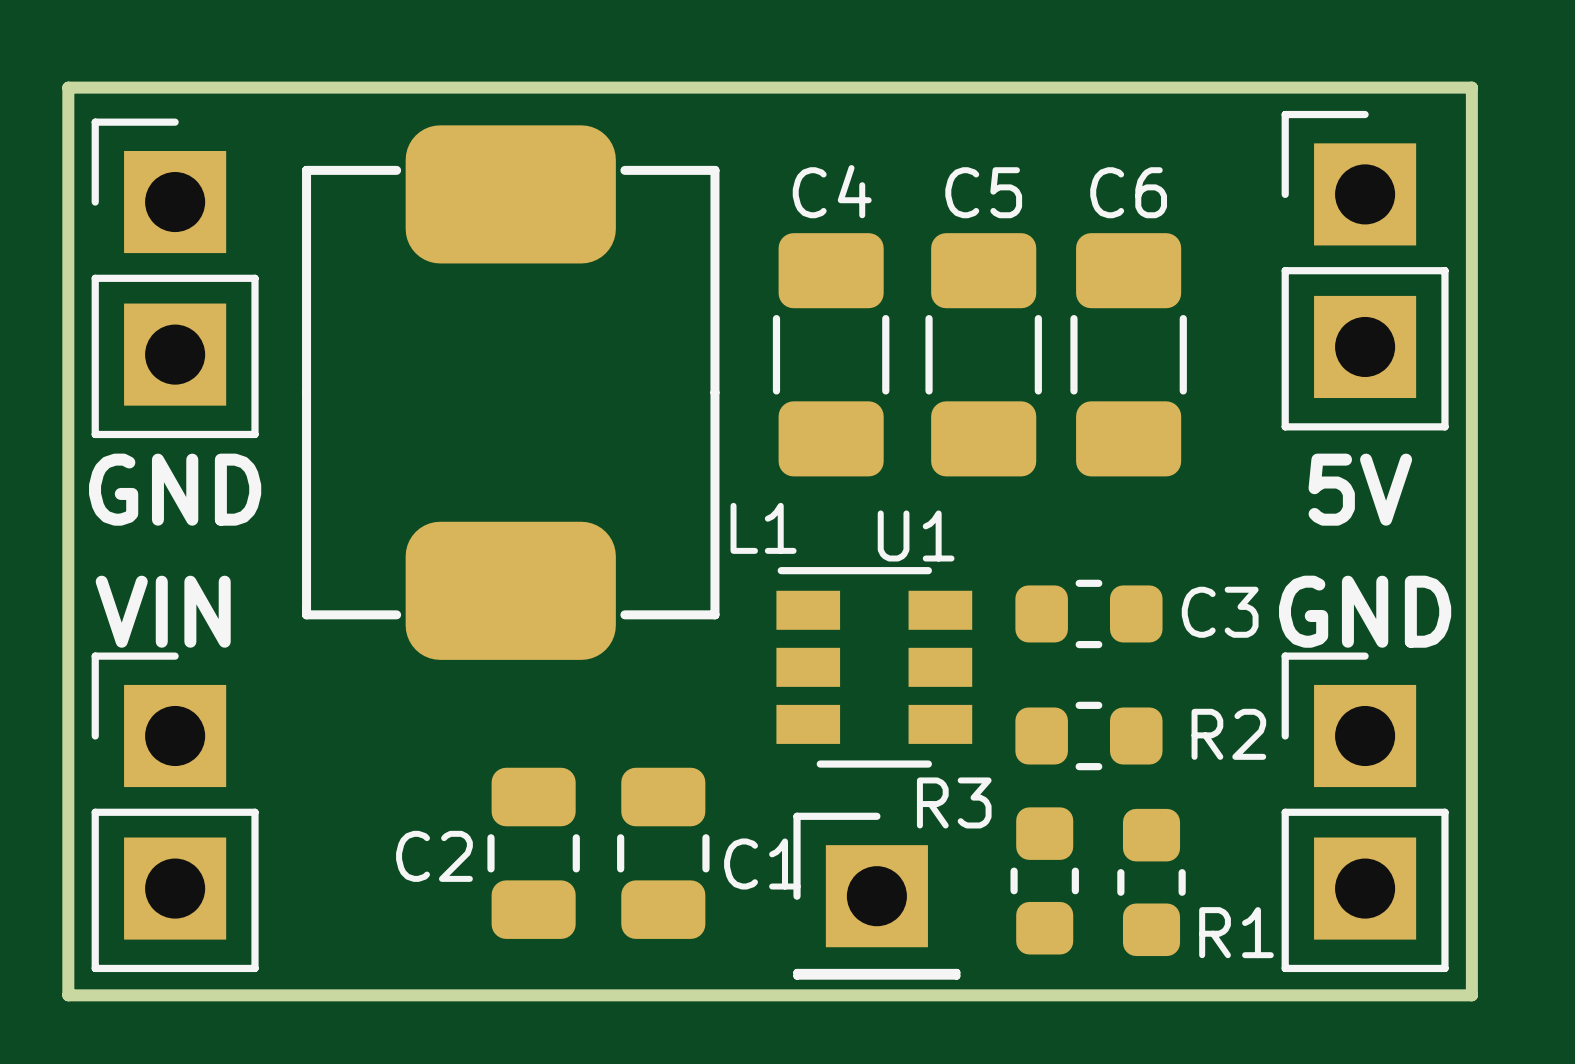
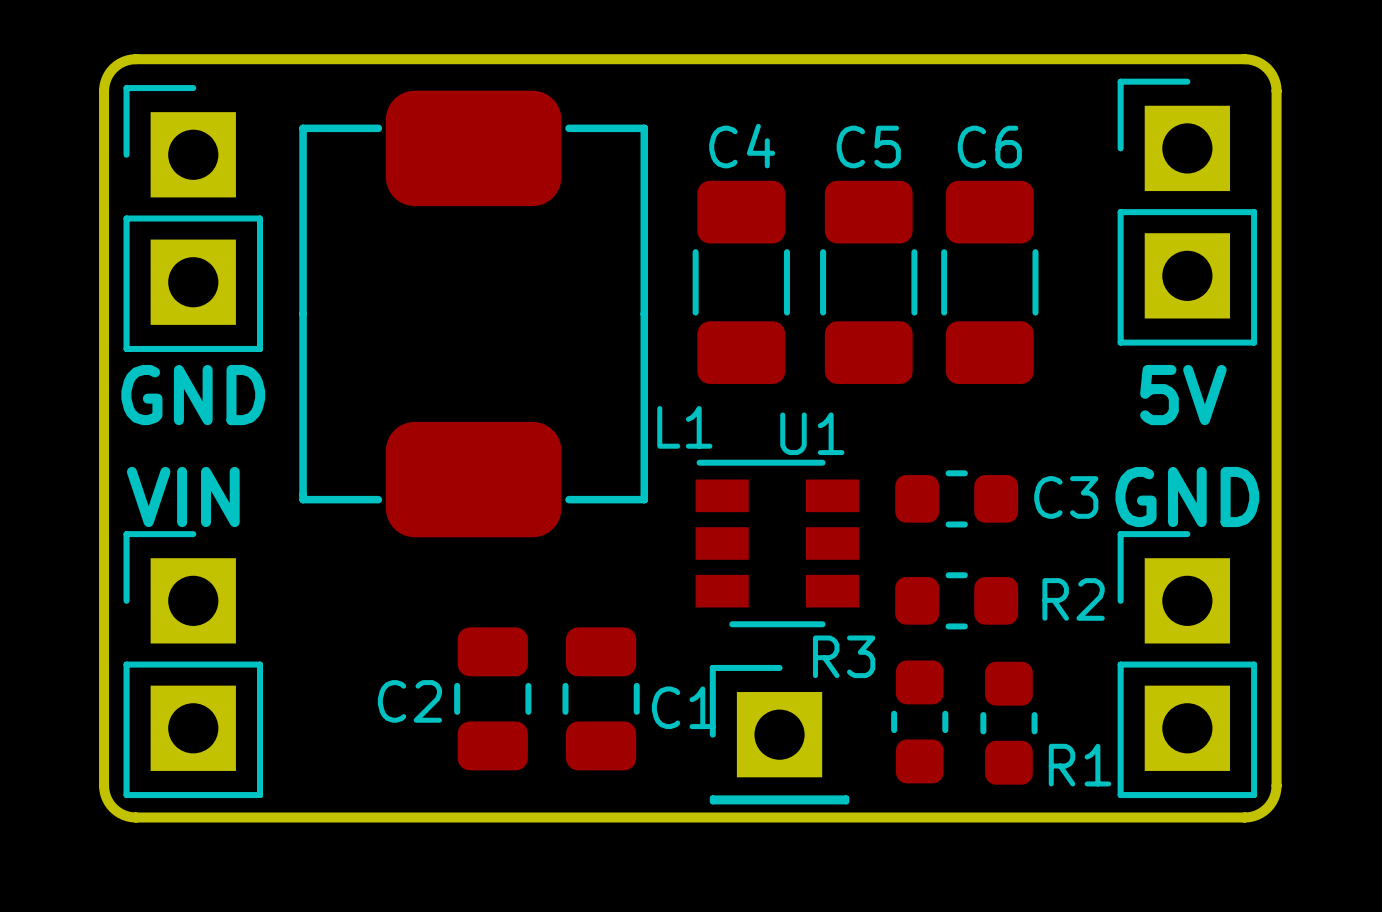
board edge: (106, 87) (68, 87) (68, 125) -> (135, 59) (123, 61) (113, 68) (106, 78) (104, 91)
board edge: (1433, 87) (1471, 87) (1471, 125) -> (1244, 59) (1256, 61) (1267, 68) (1274, 78) (1276, 91)
board edge: (68, 957) (68, 995) (106, 995) -> (104, 785) (106, 797) (113, 808) (123, 815) (135, 817)
board edge: (1471, 957) (1471, 995) (1433, 995) -> (1276, 785) (1274, 797) (1267, 808) (1256, 815) (1244, 817)

